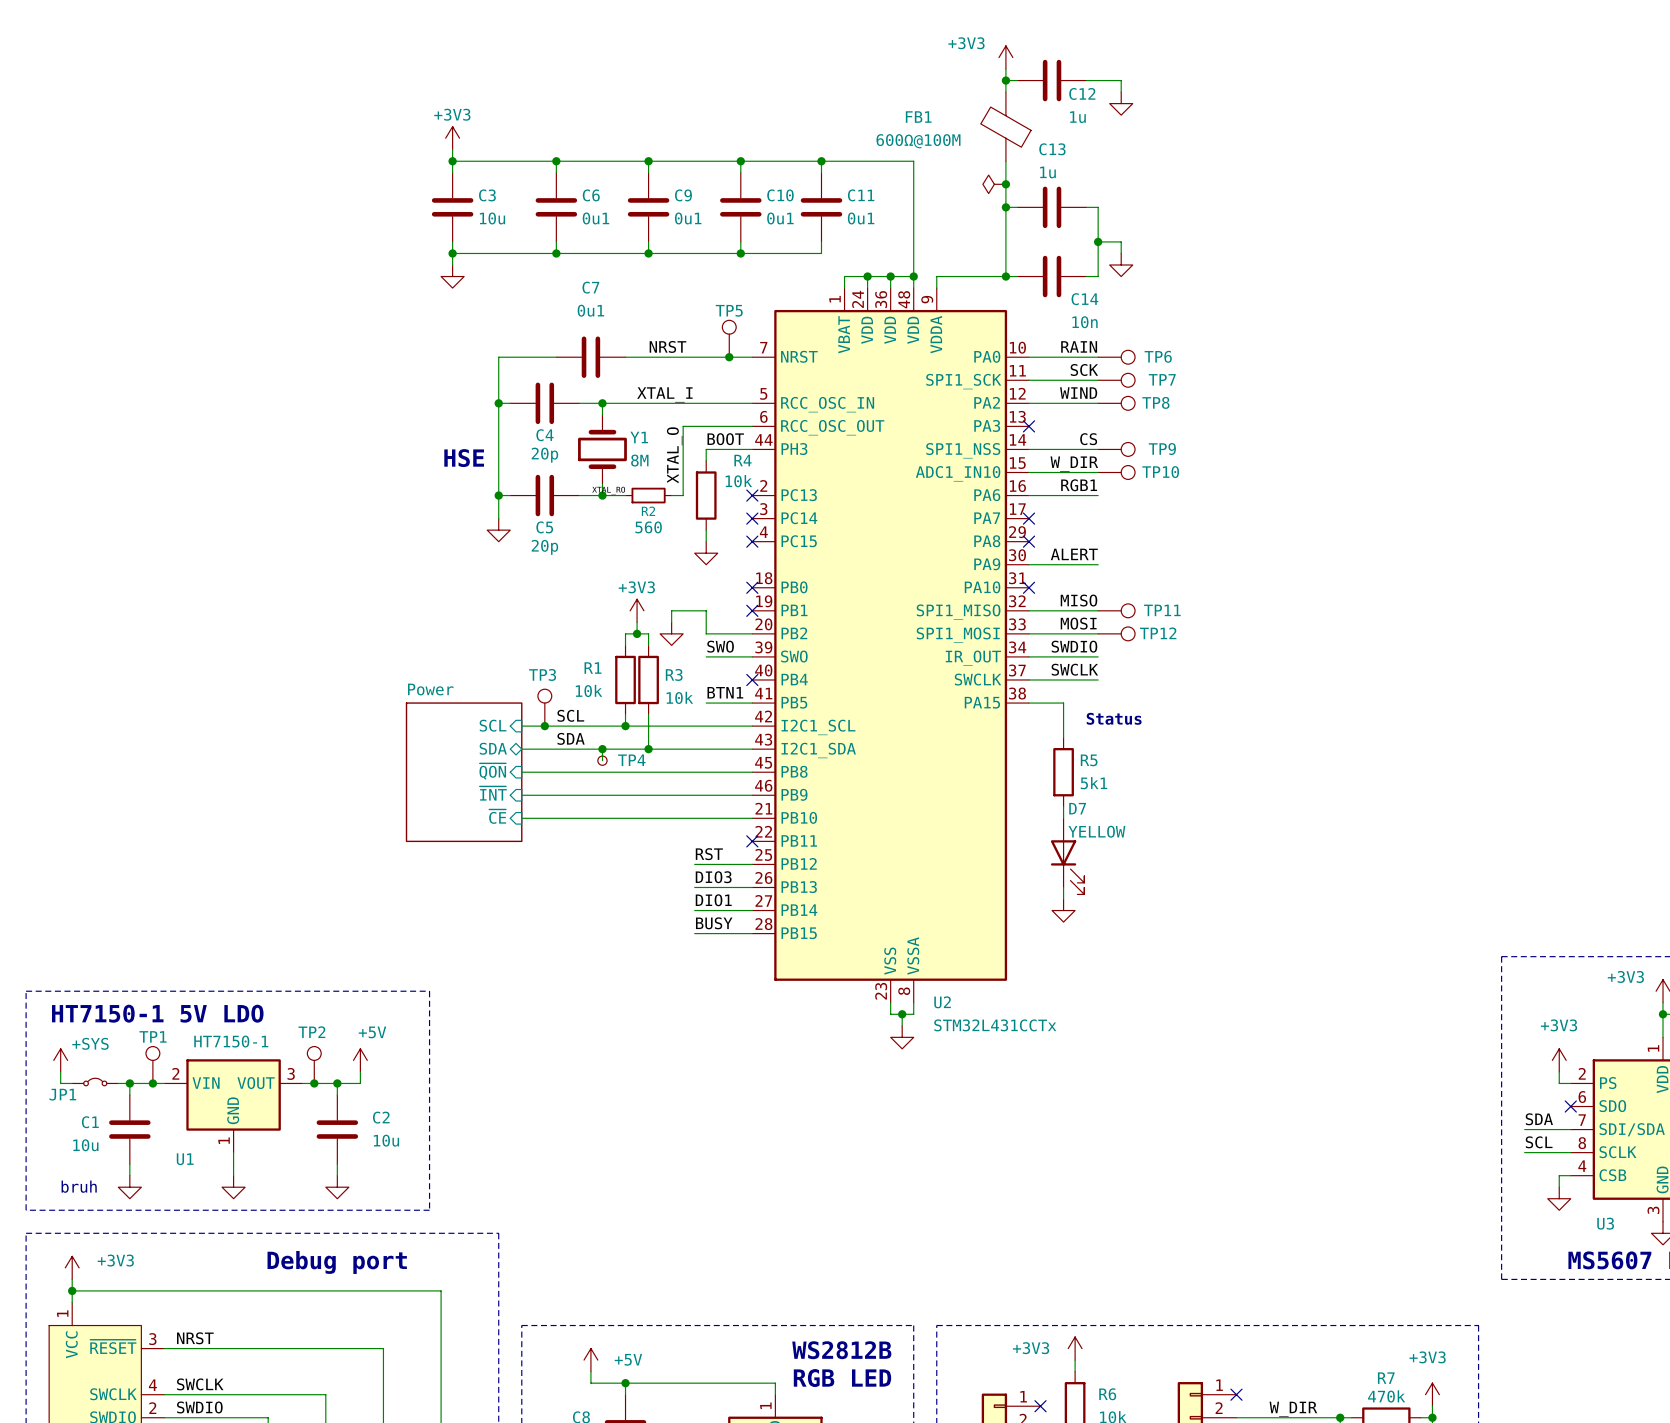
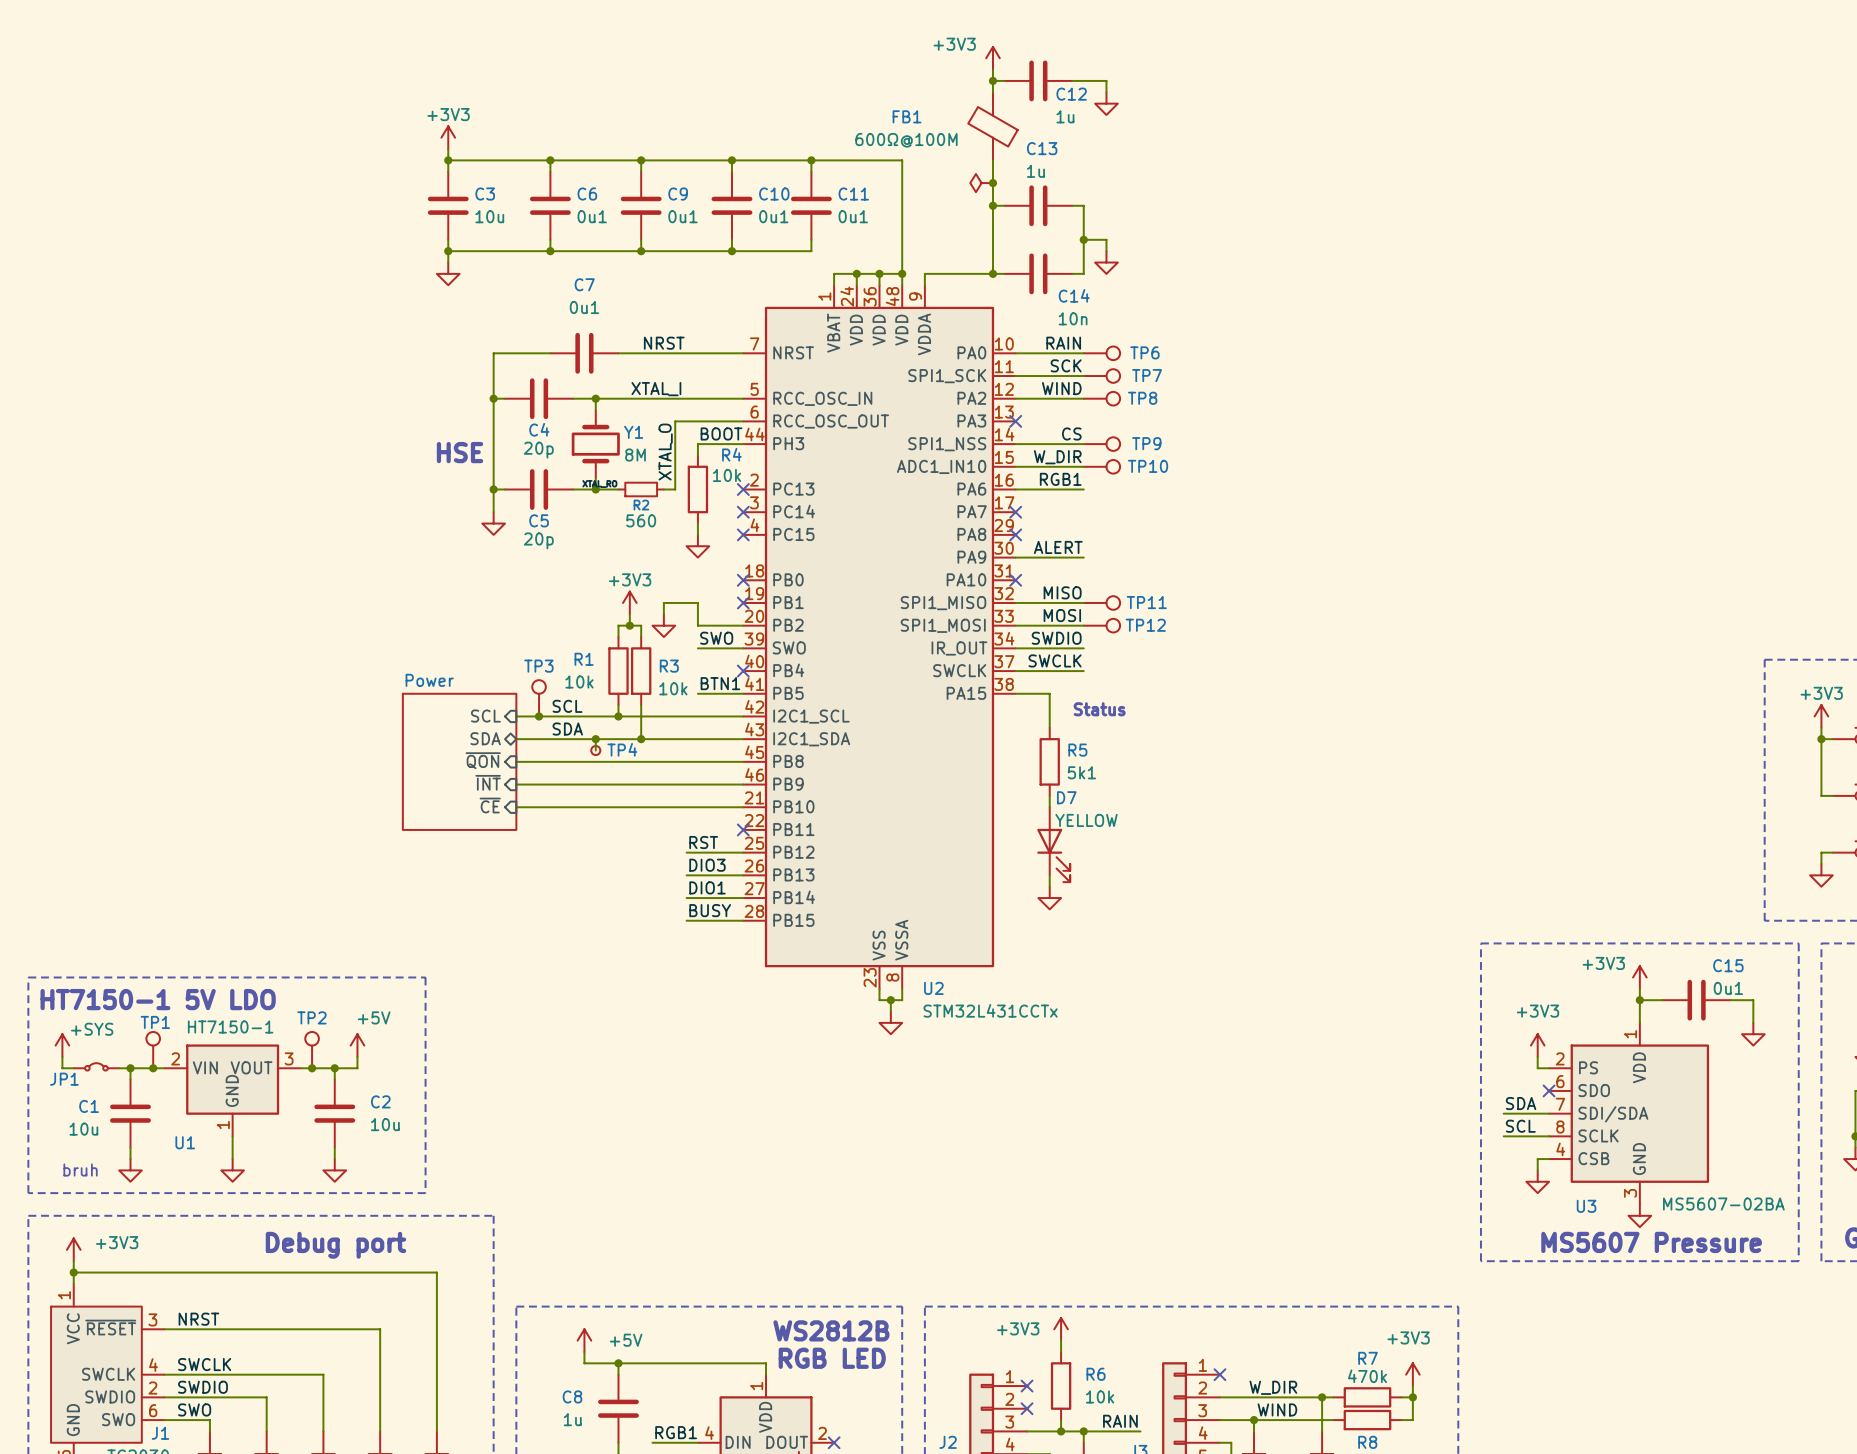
TP5: (729, 338) -> none
junction: (729, 357) -> none

